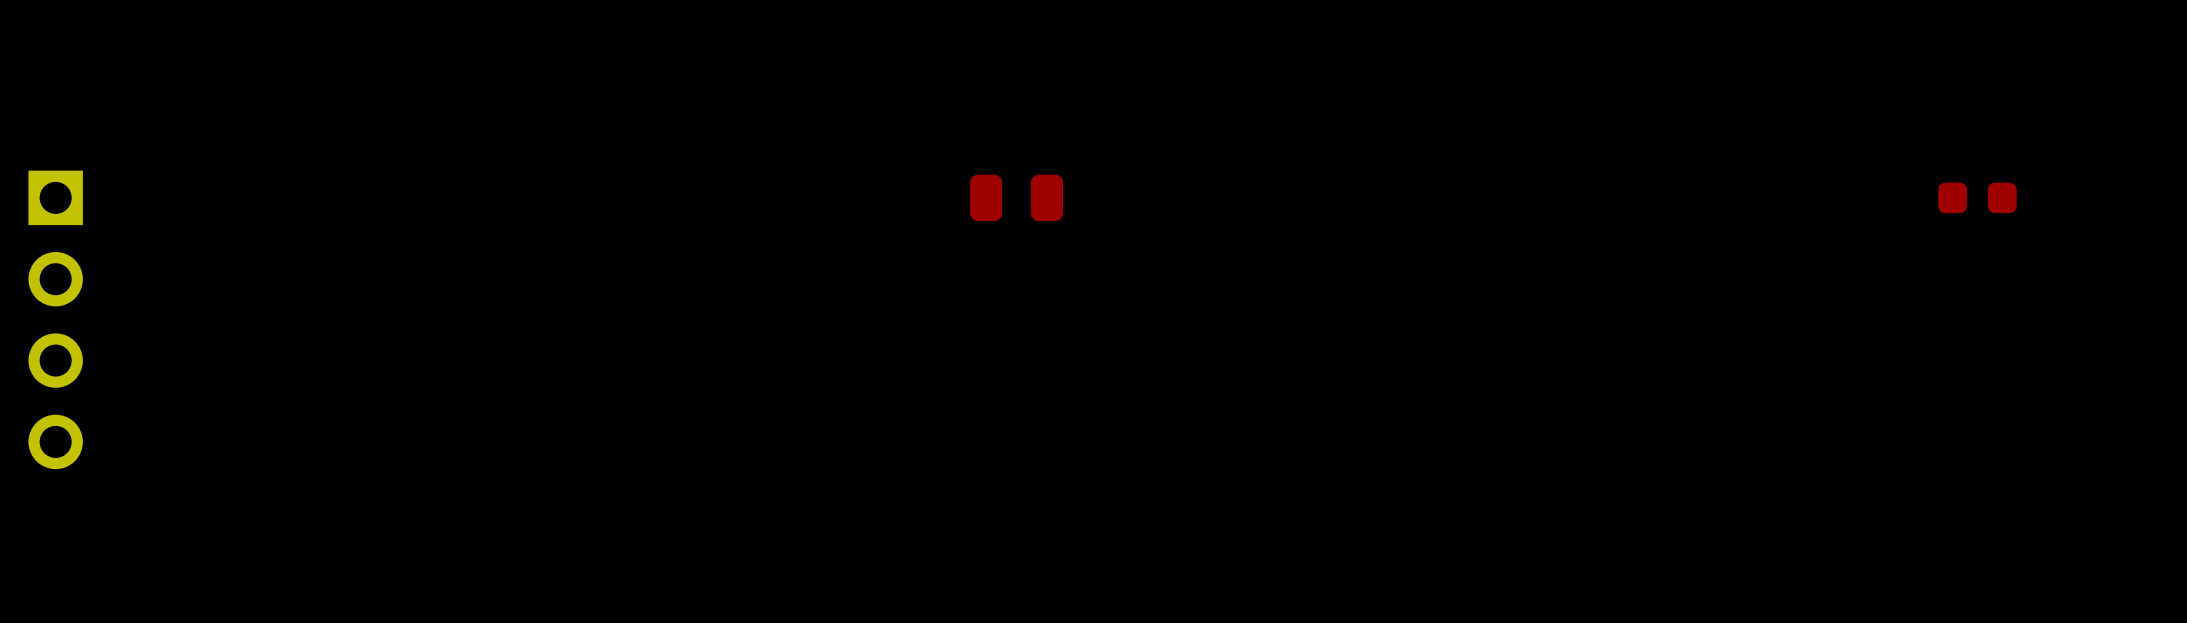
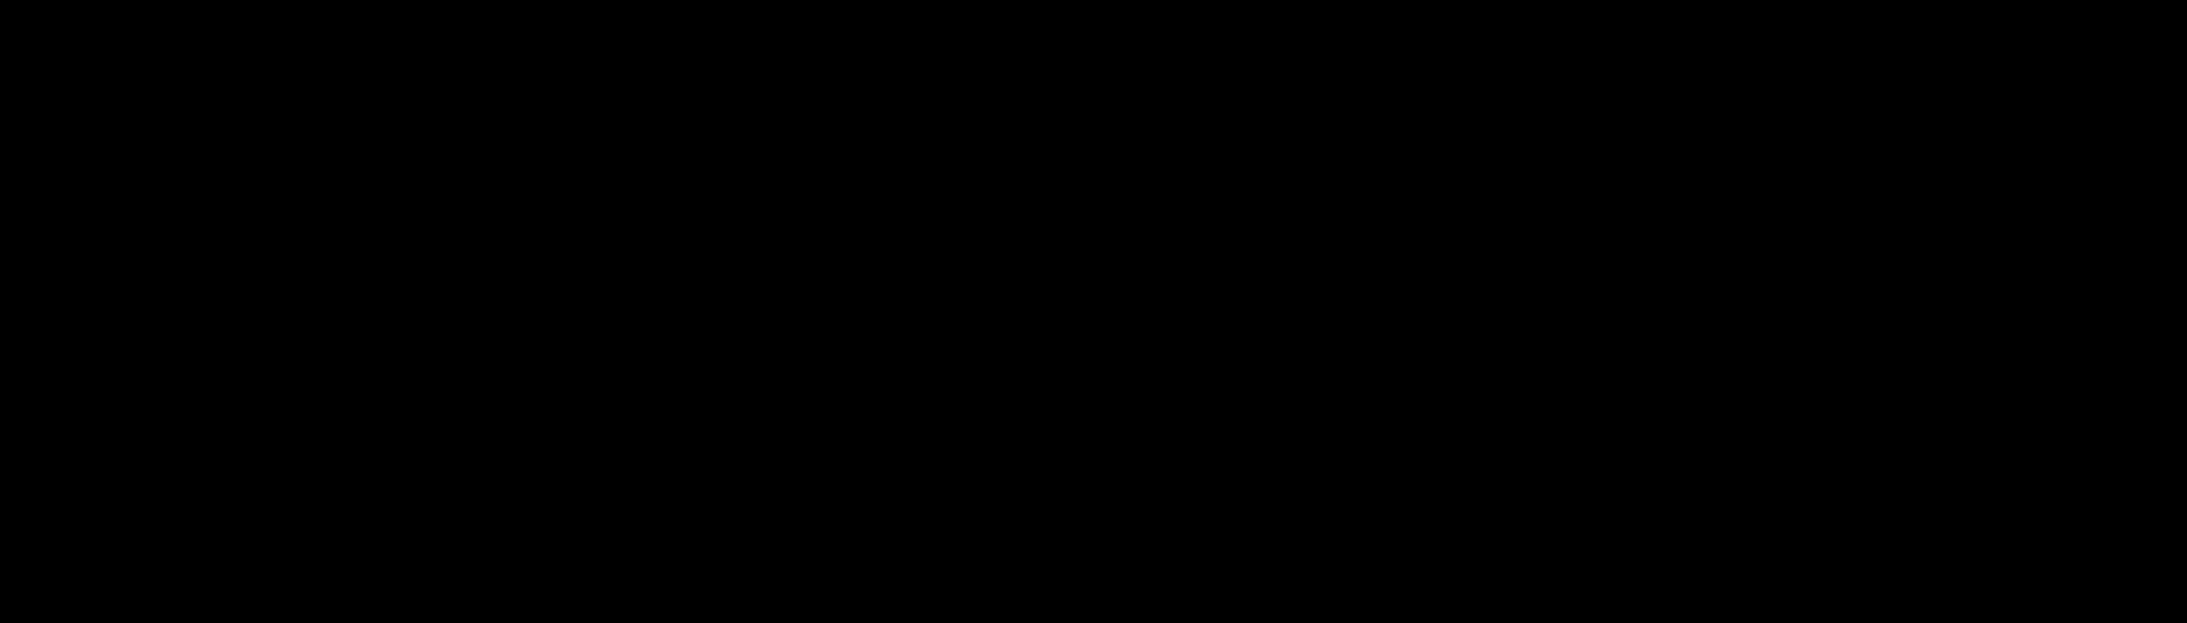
part: (1016, 197) -> none
part: (1977, 197) -> none
part: (55, 319) -> none

